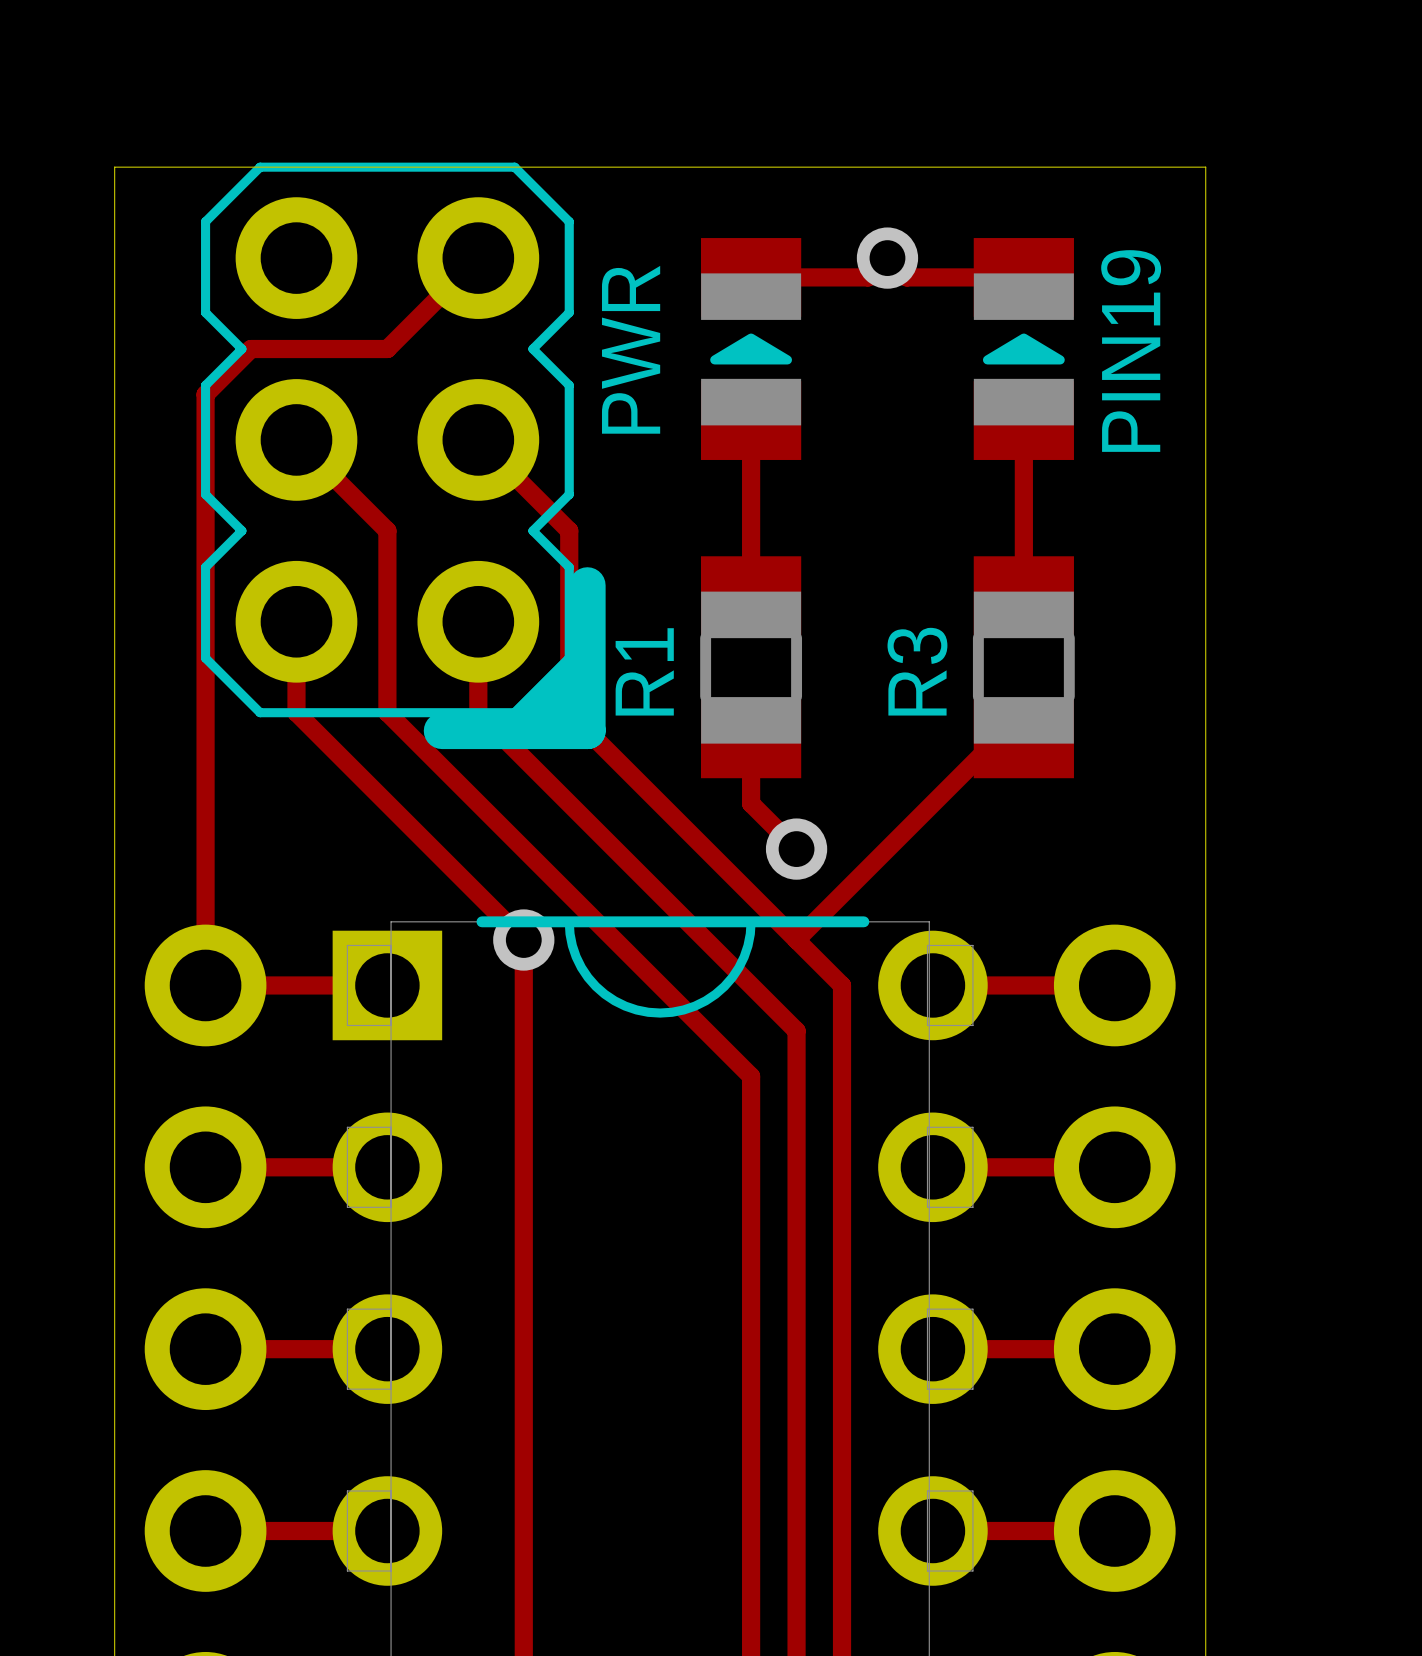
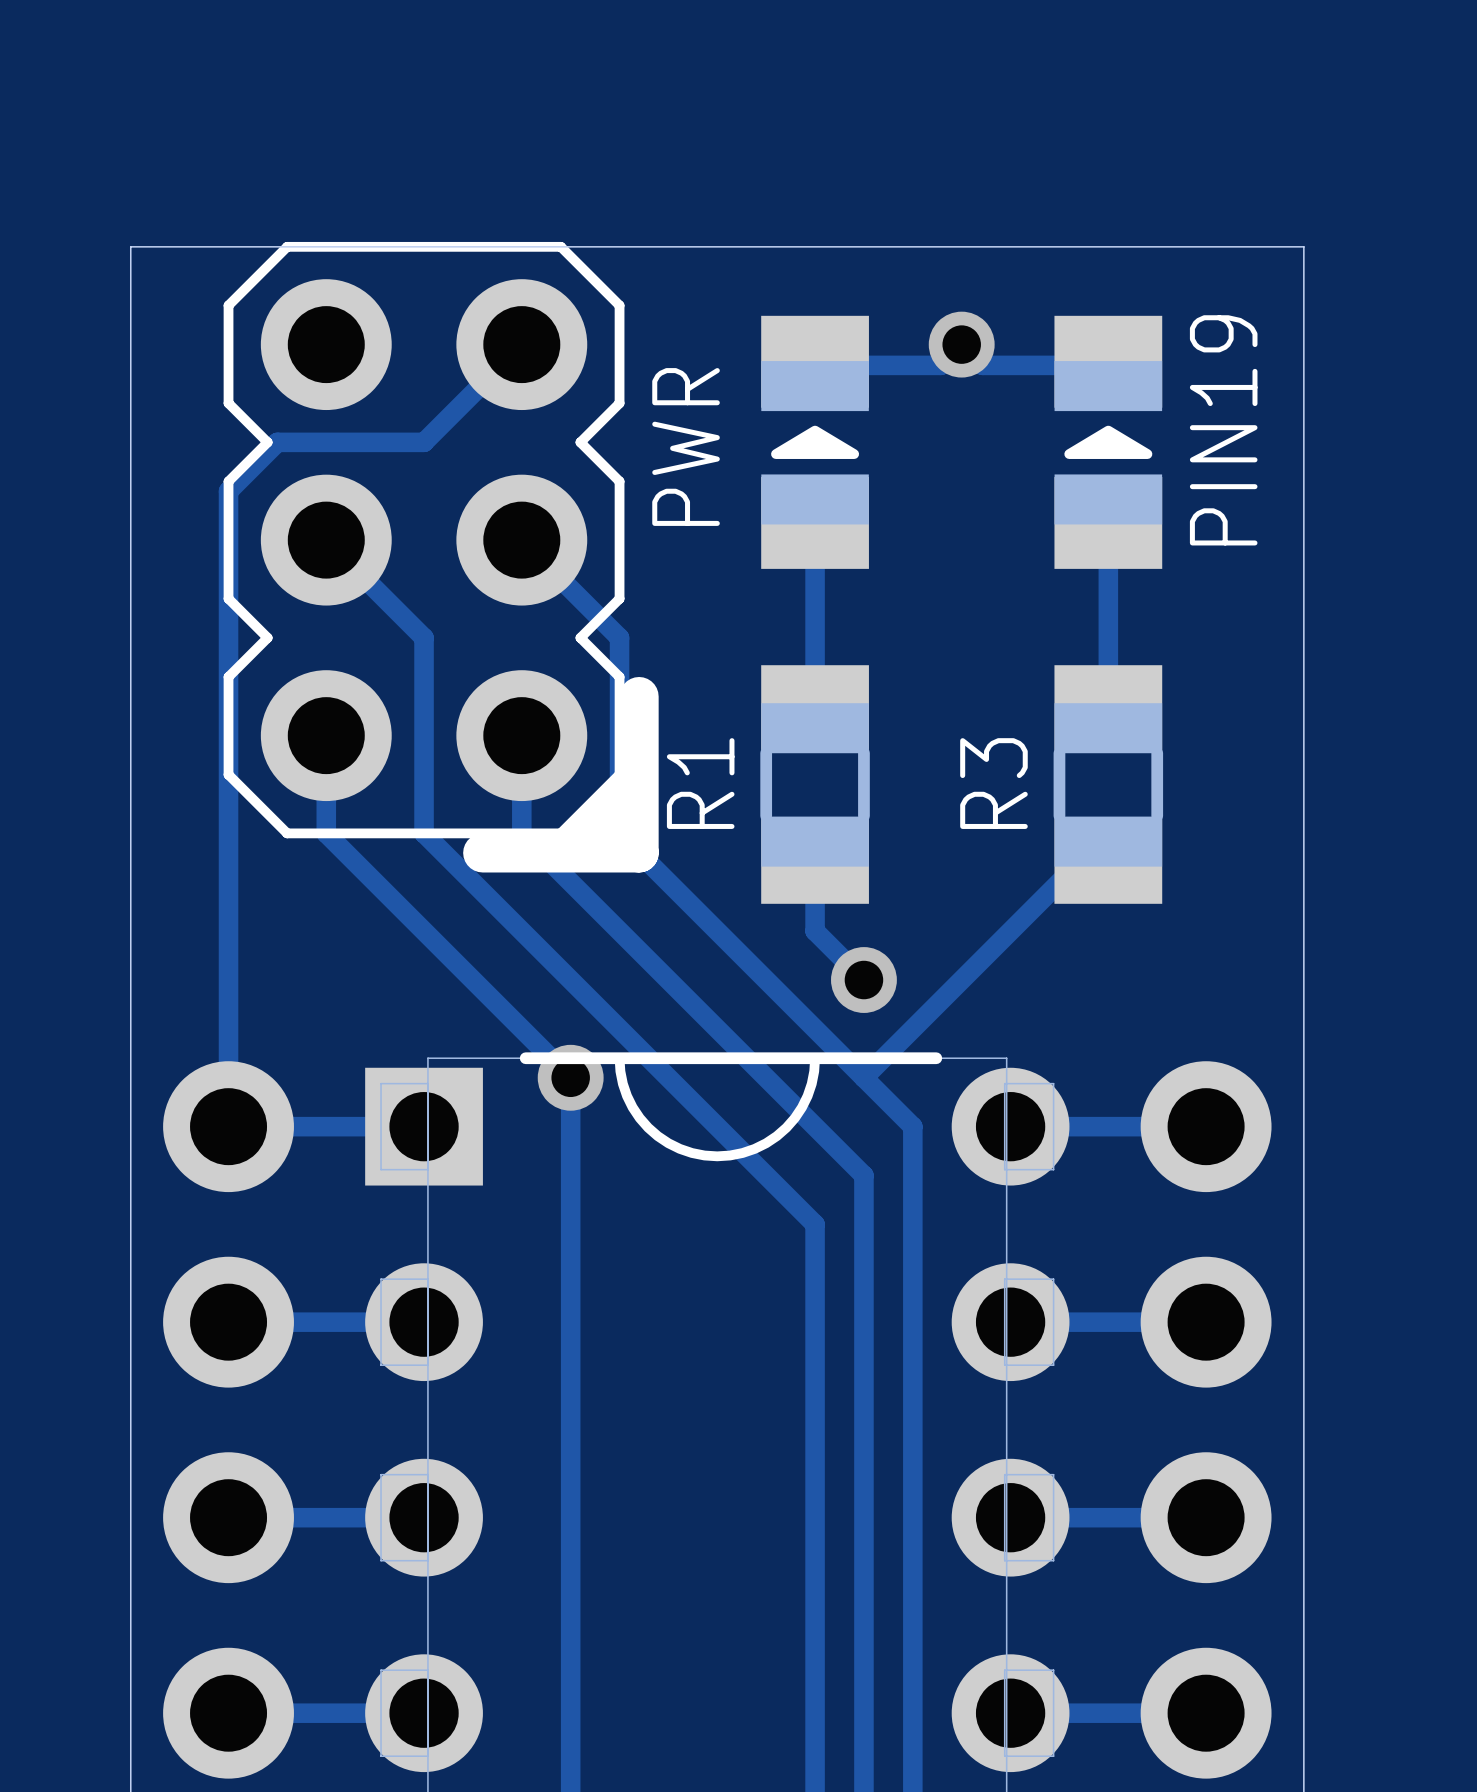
part footprint: [700, 238, 802, 460] -> [761, 315, 869, 569]
part footprint: [973, 238, 1074, 460] -> [1054, 315, 1163, 569]

